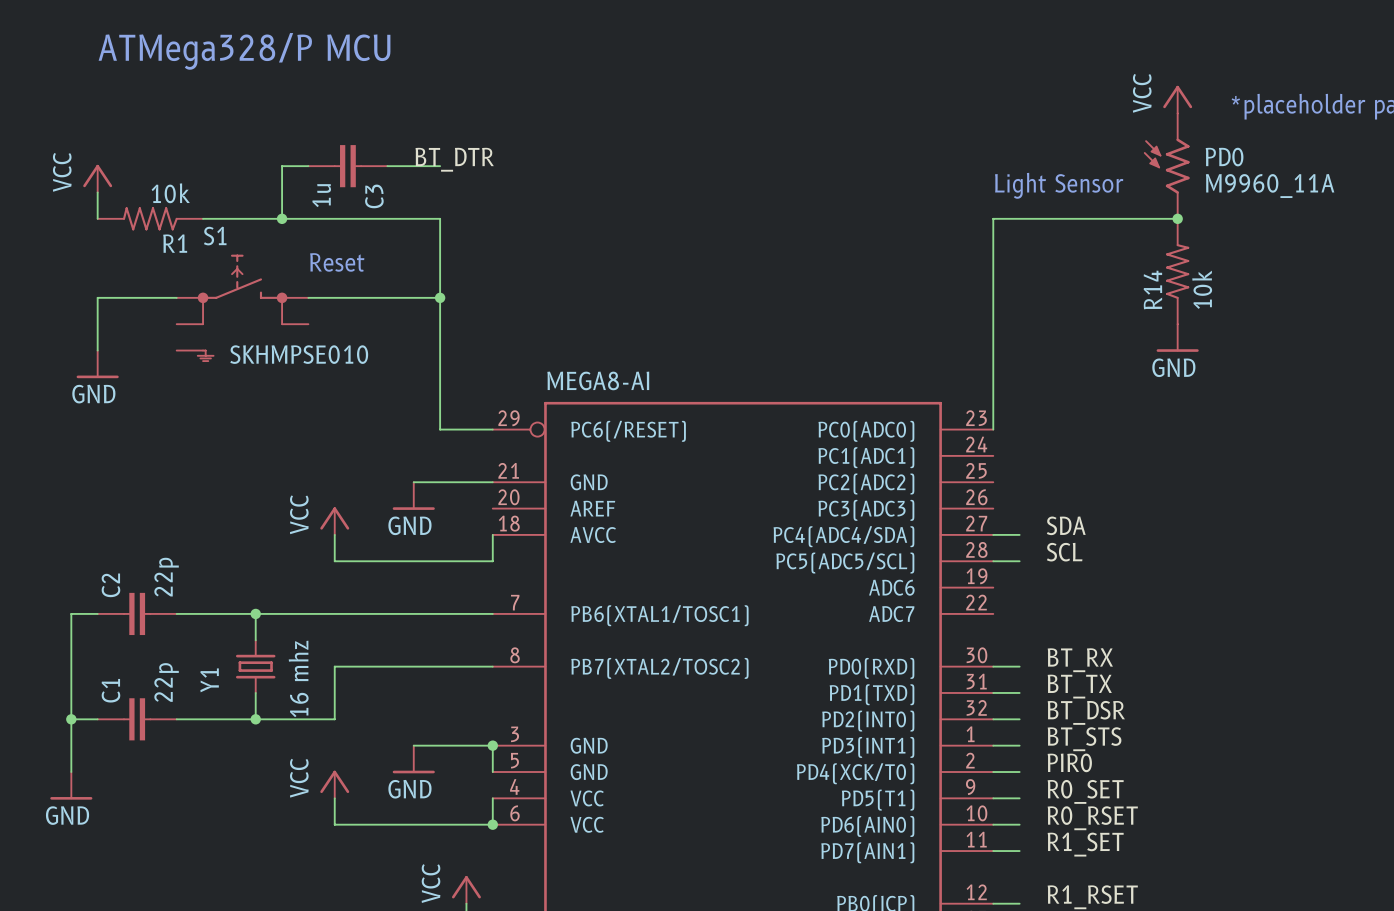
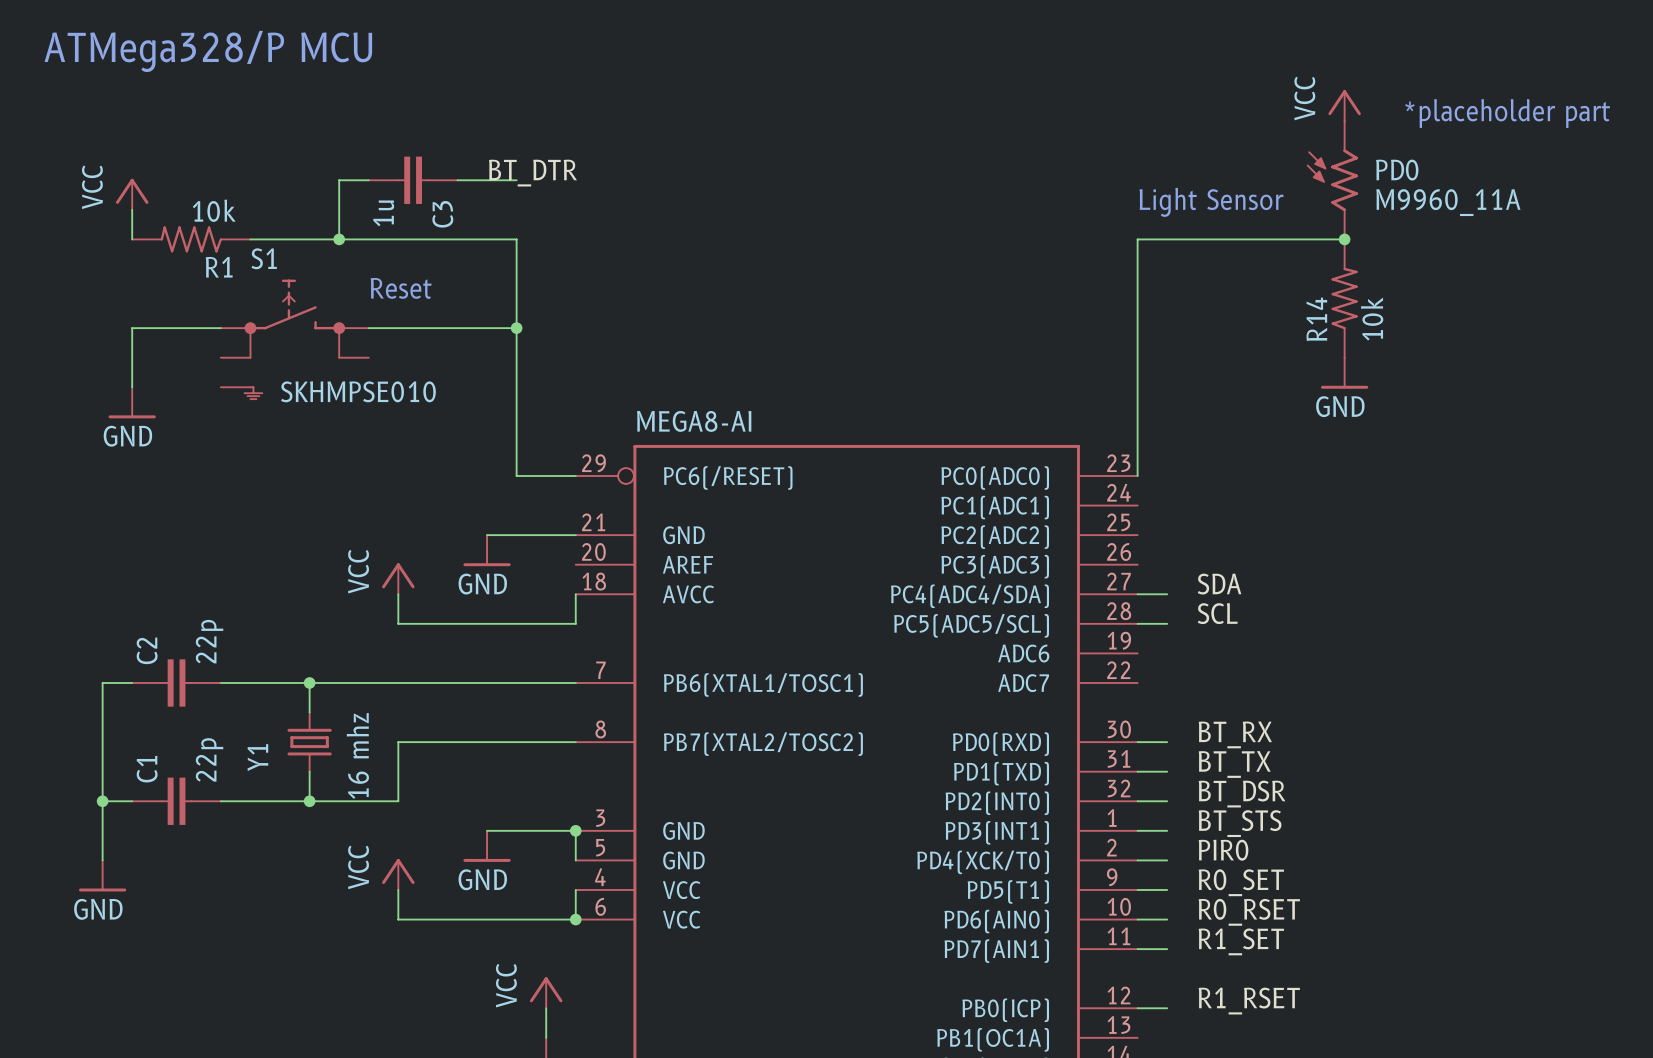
text position: ATMega328/P MCU (244, 51) -> ATMega328/P MCU (208, 51)

